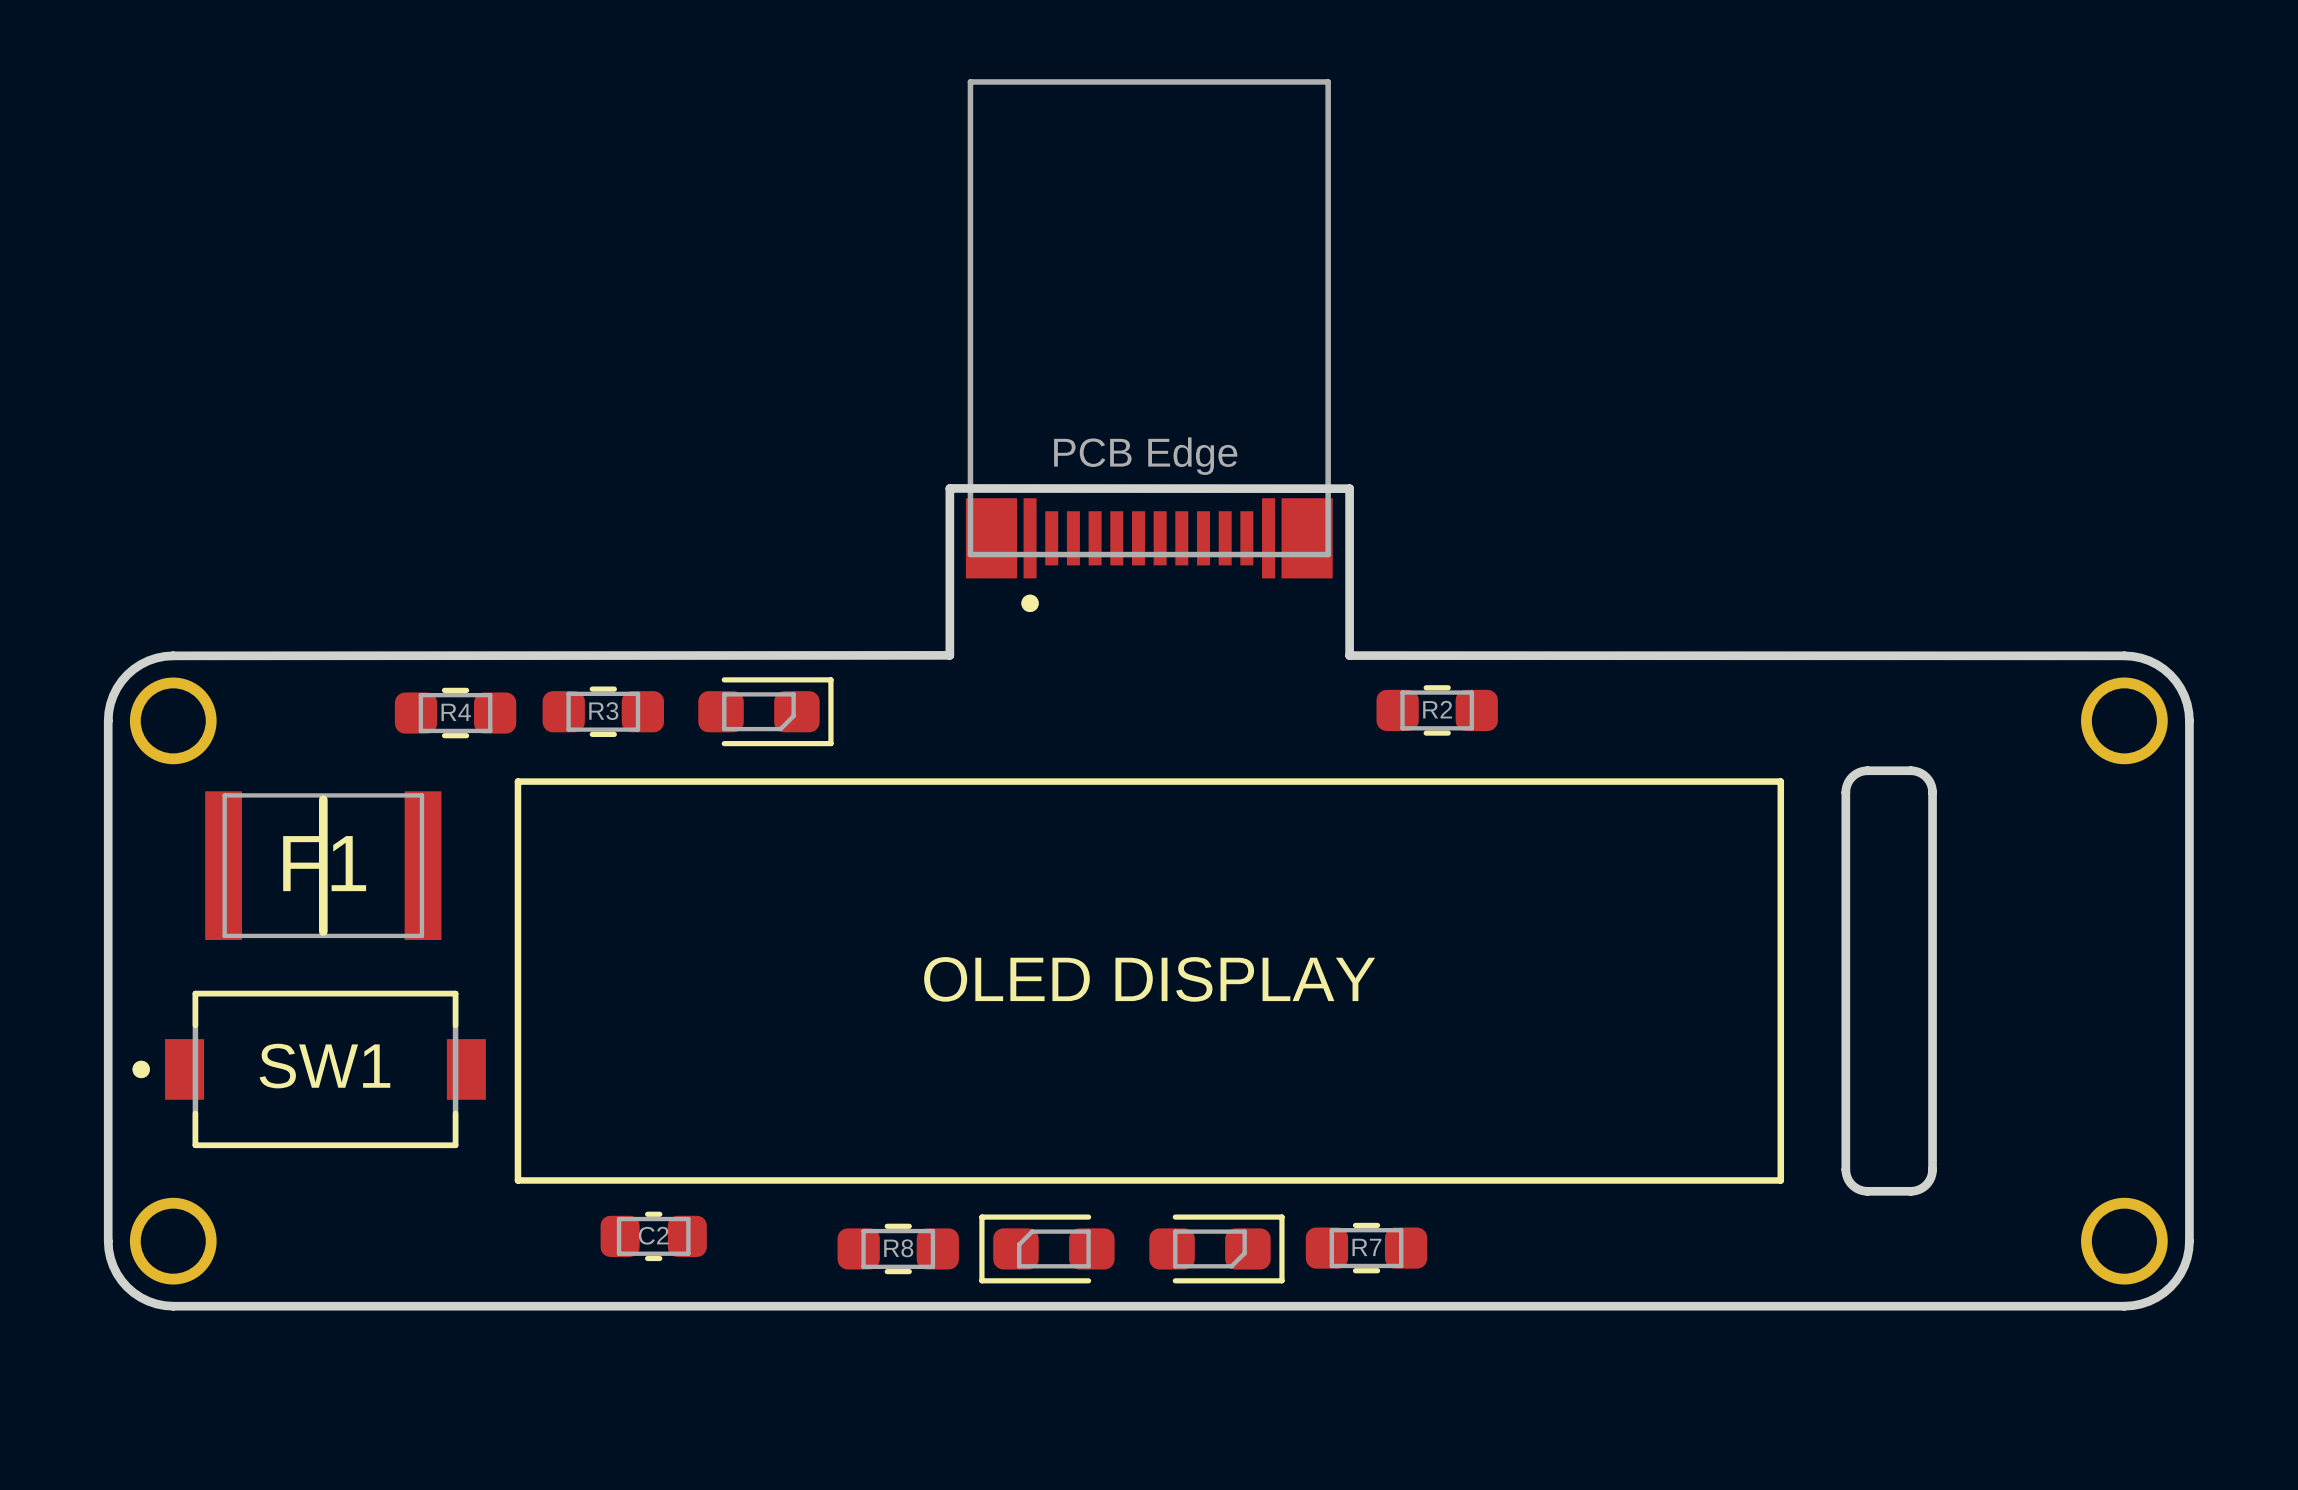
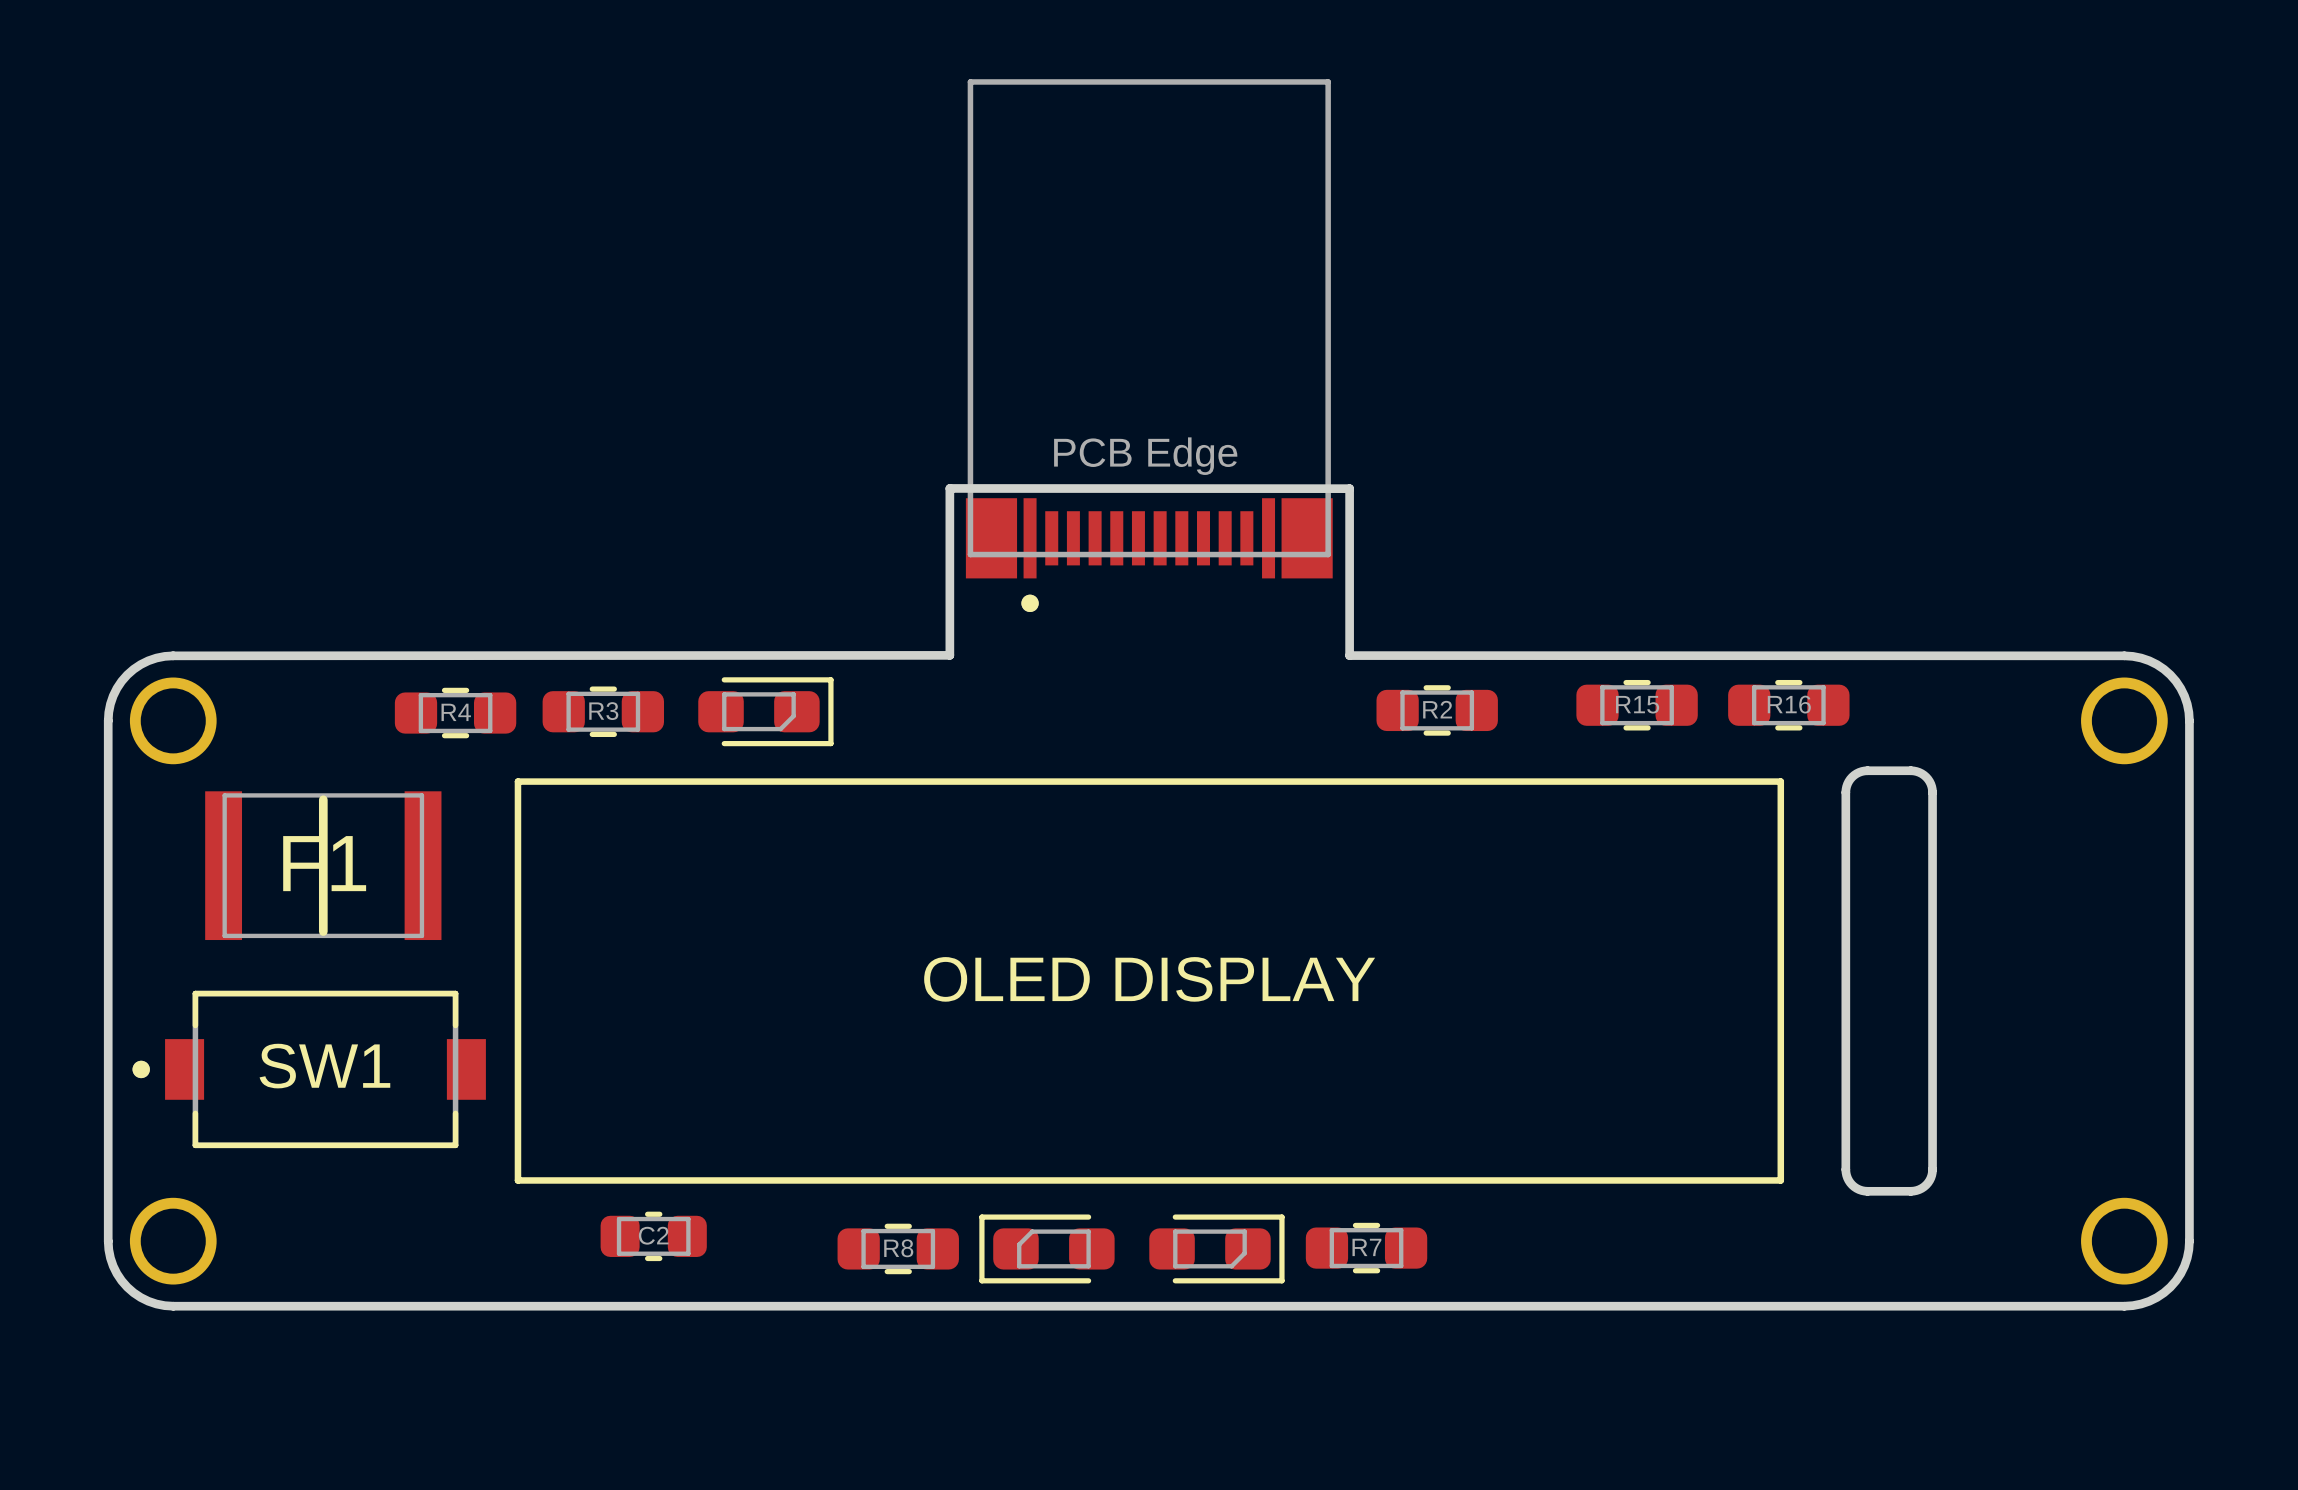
R15: none -> (1637, 705)
R16: none -> (1788, 705)

